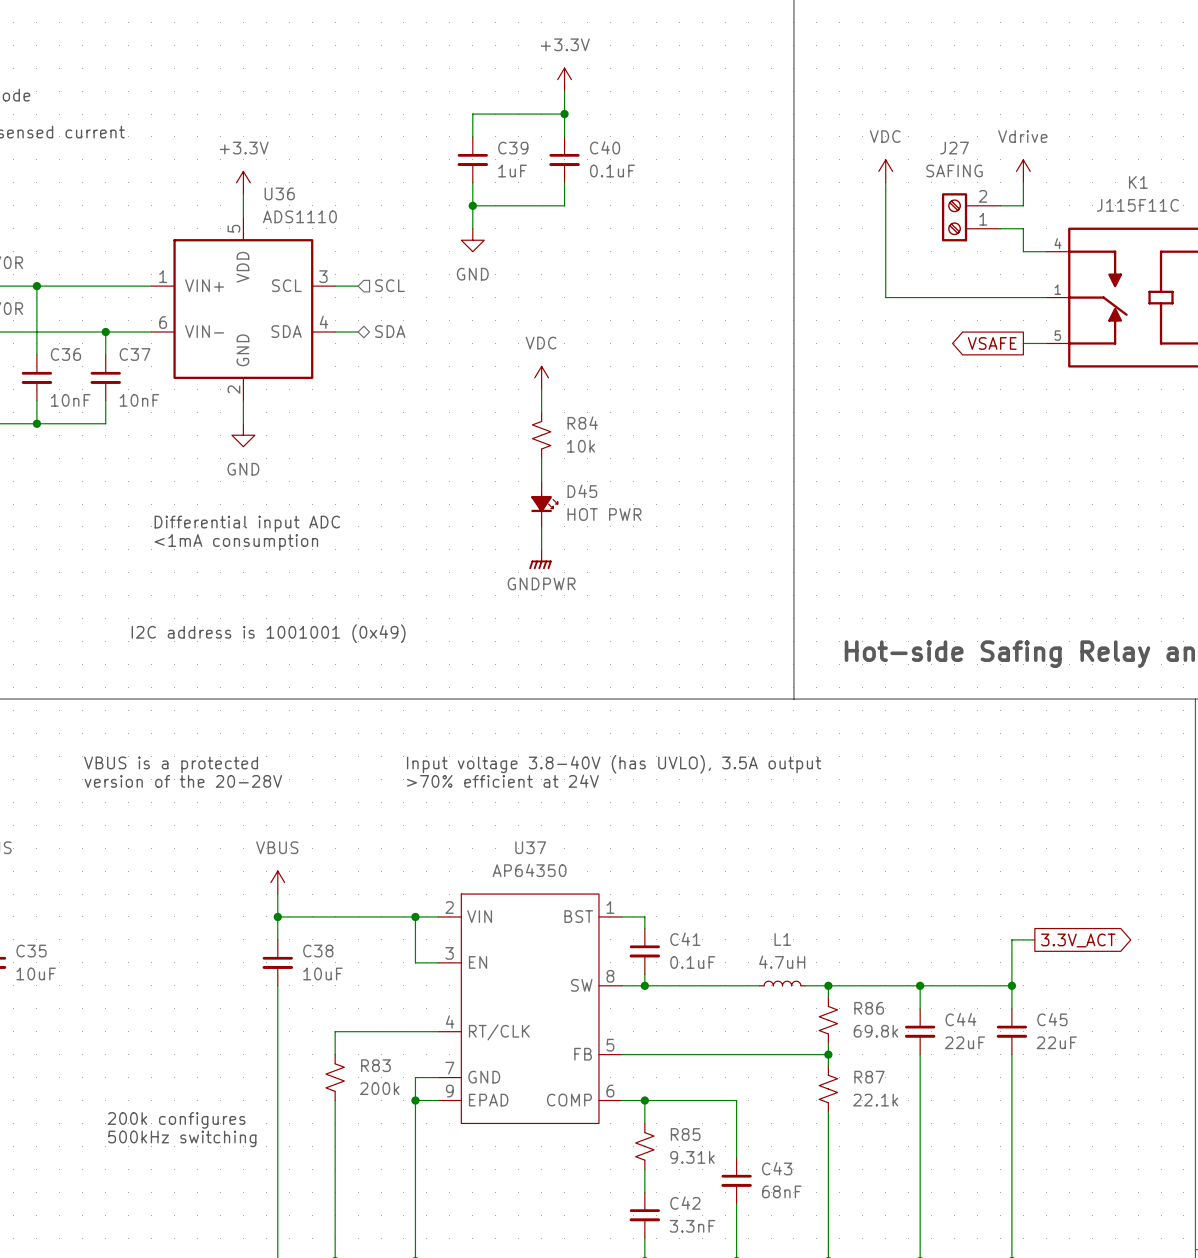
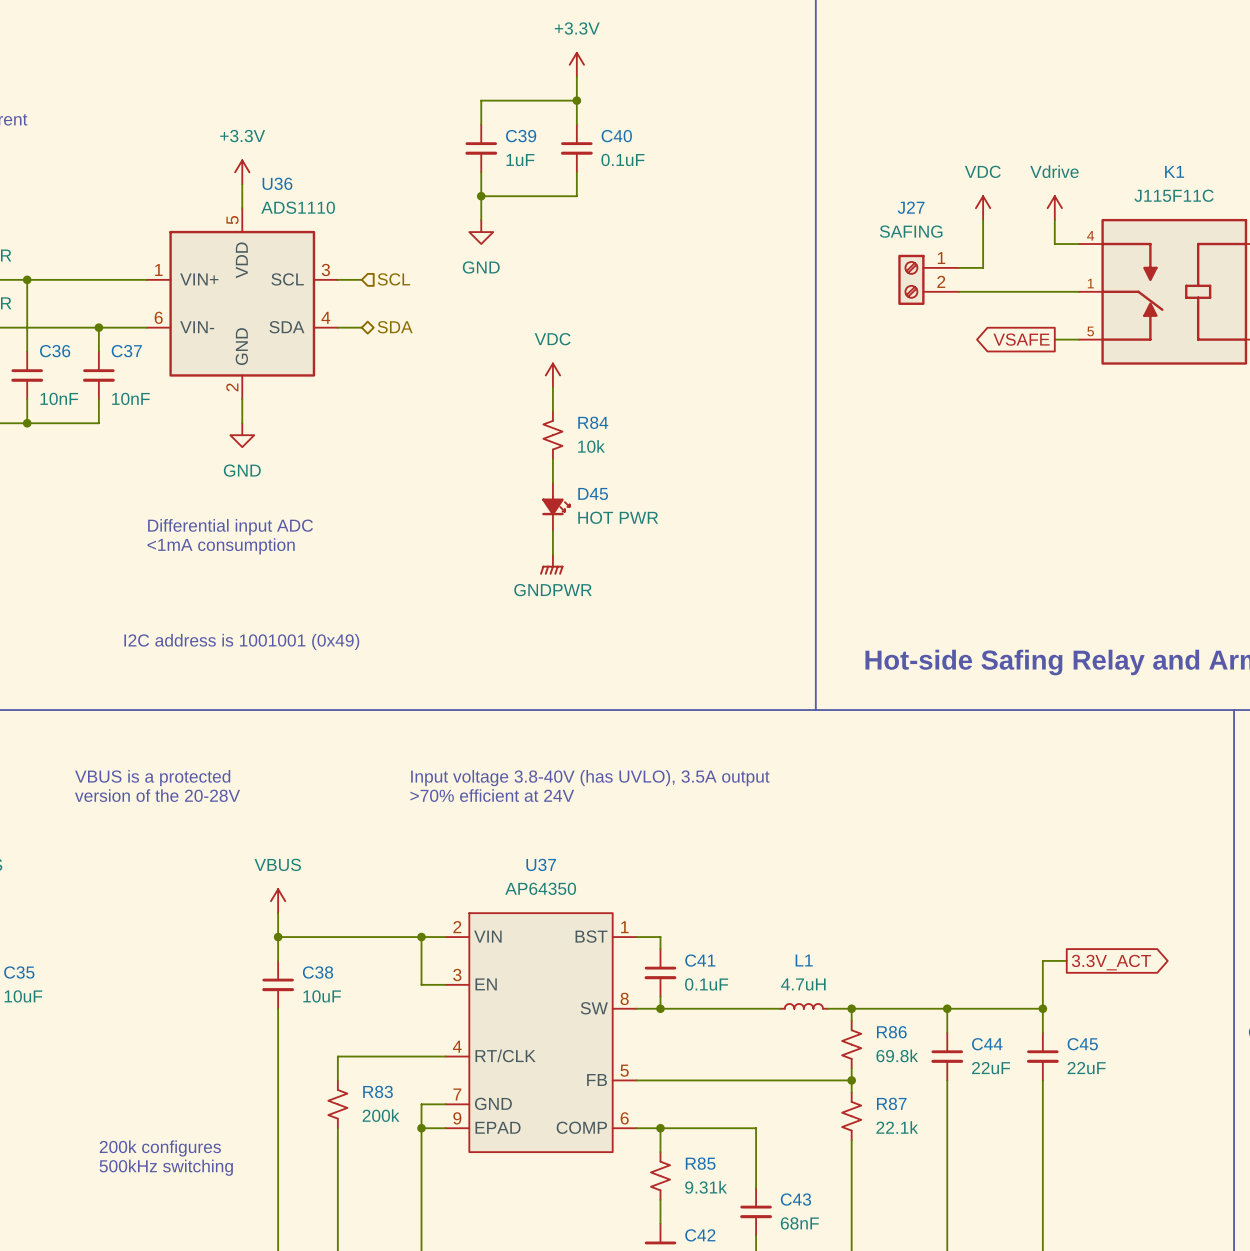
power symbol position: VDC (885, 171) -> VDC (983, 208)
power symbol position: Vdrive (1023, 171) -> Vdrive (1054, 208)
wire: (885, 182) (885, 297) (931, 297) -> none
wire: (1023, 182) (1023, 205) (1000, 205) -> none
J27 flip: as is (954, 217) -> up-down (911, 279)
J27 position: (971, 217) -> (928, 279)
wire: none -> (983, 220) (983, 267) (959, 267)
wire: (1000, 228) (1023, 228) -> none

